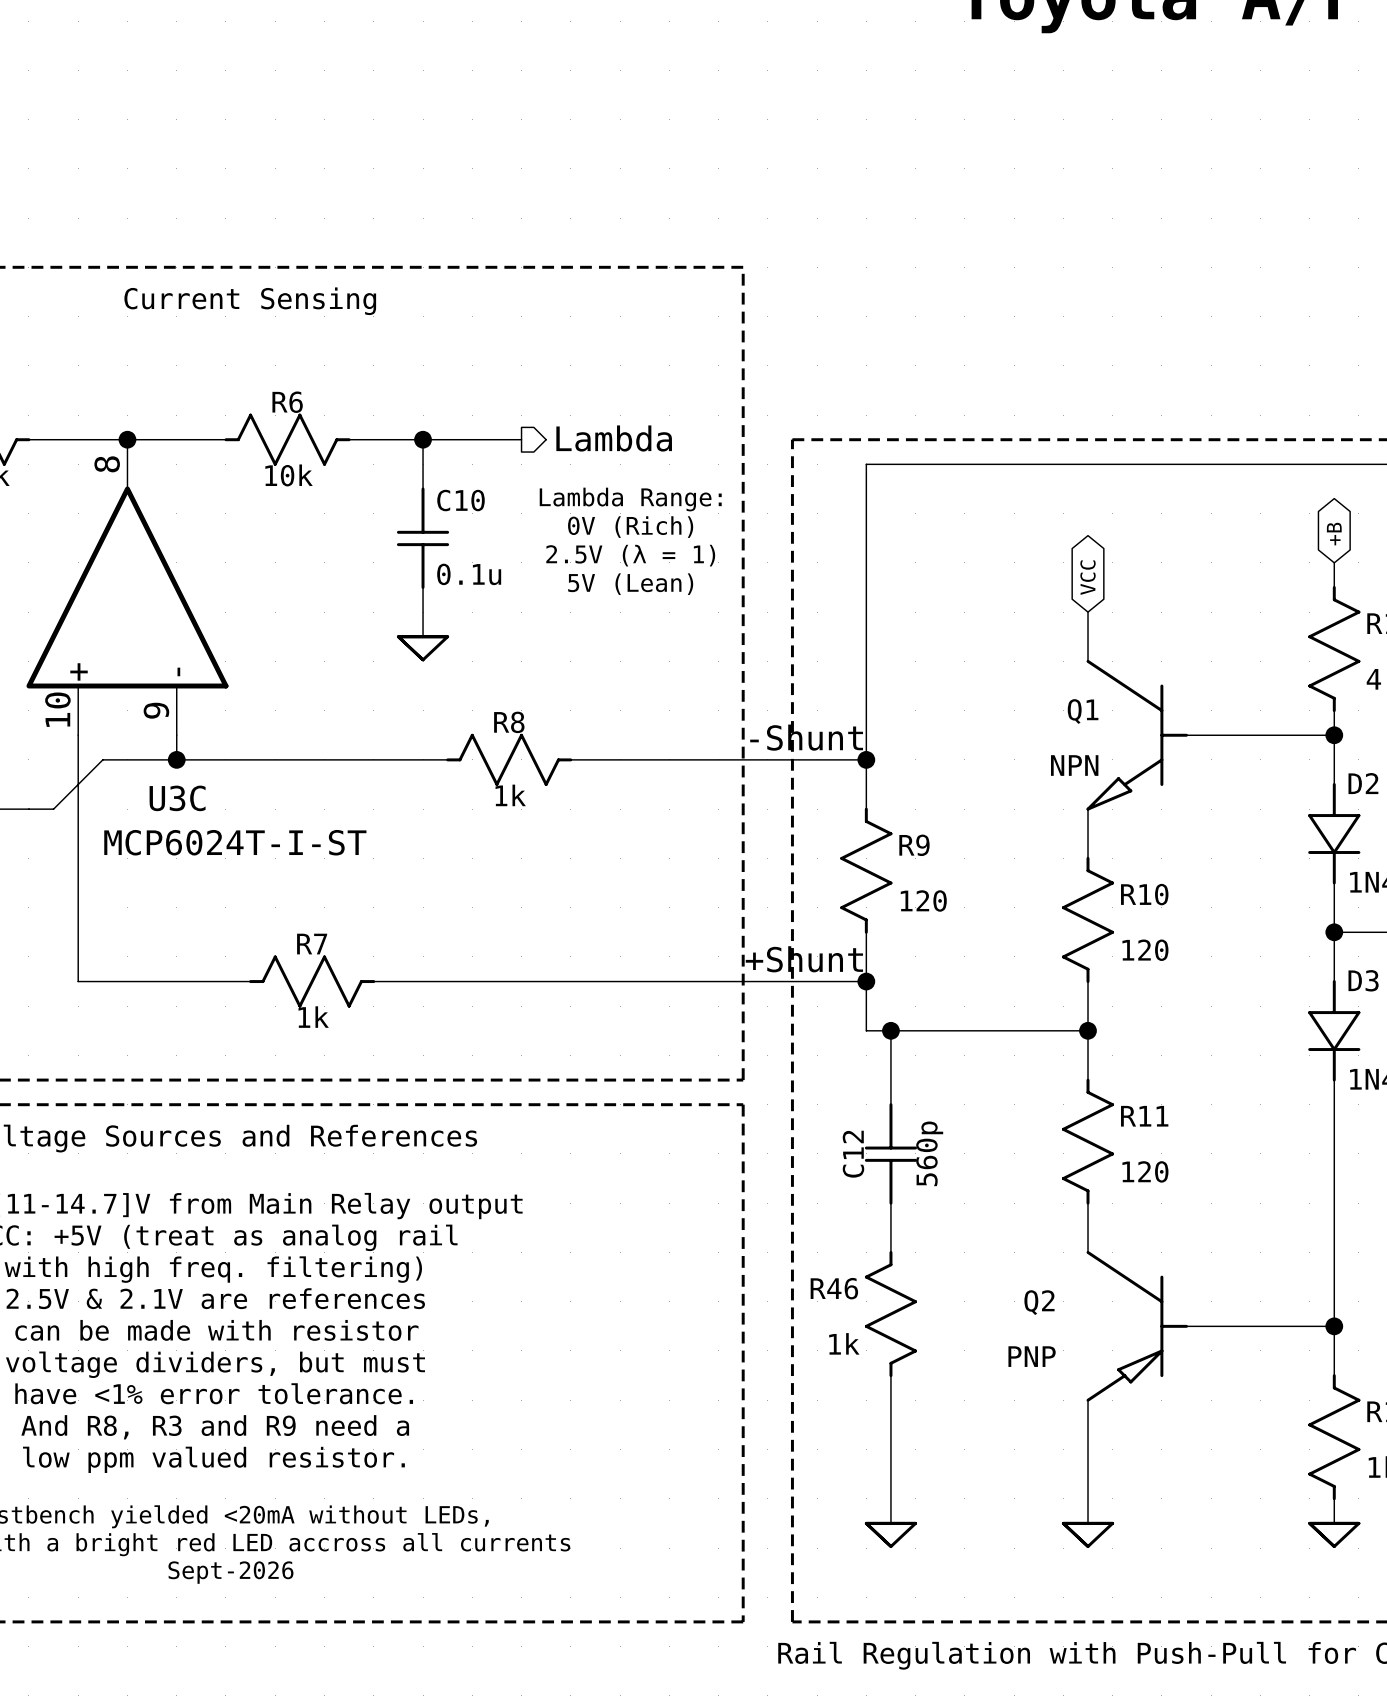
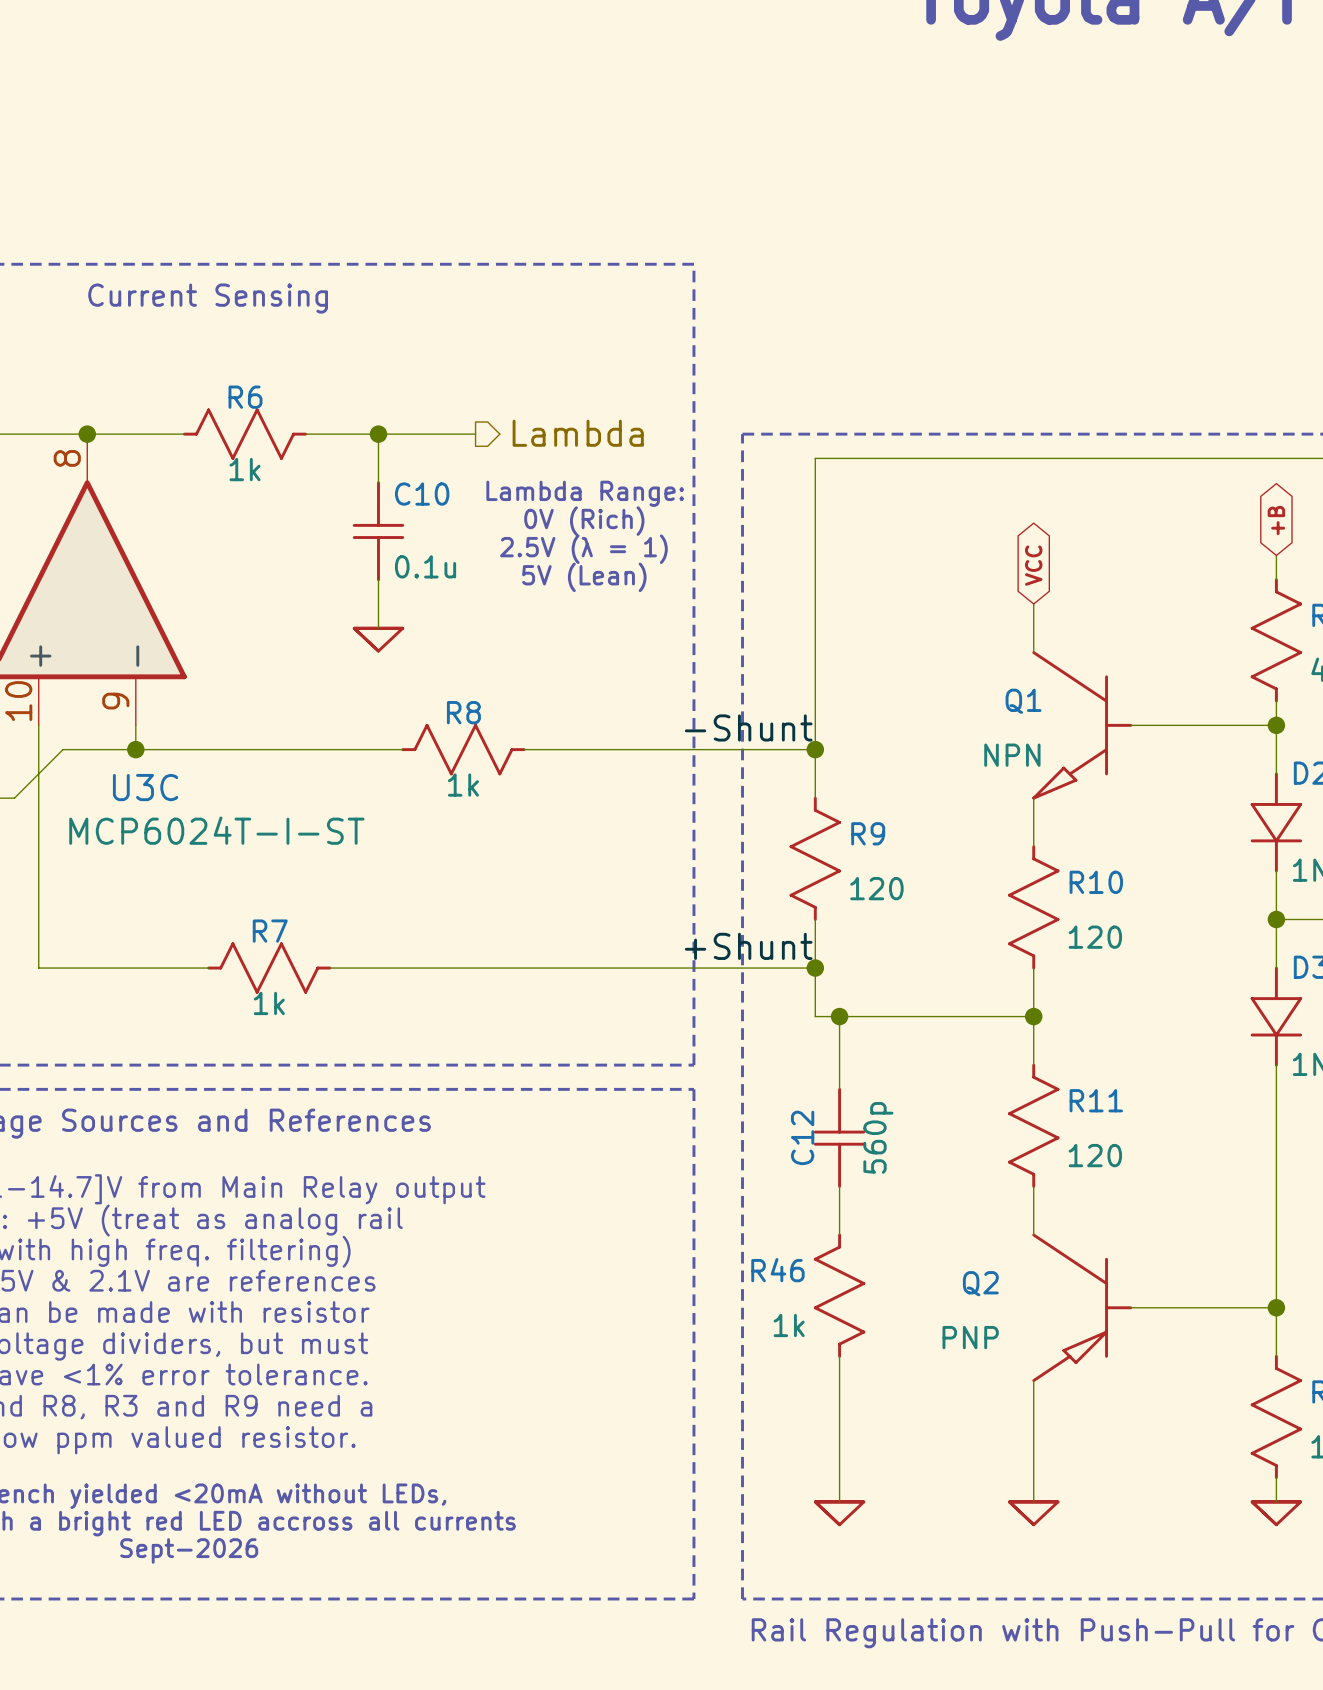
R6 value: 10k (289, 475) -> 1k (245, 469)

